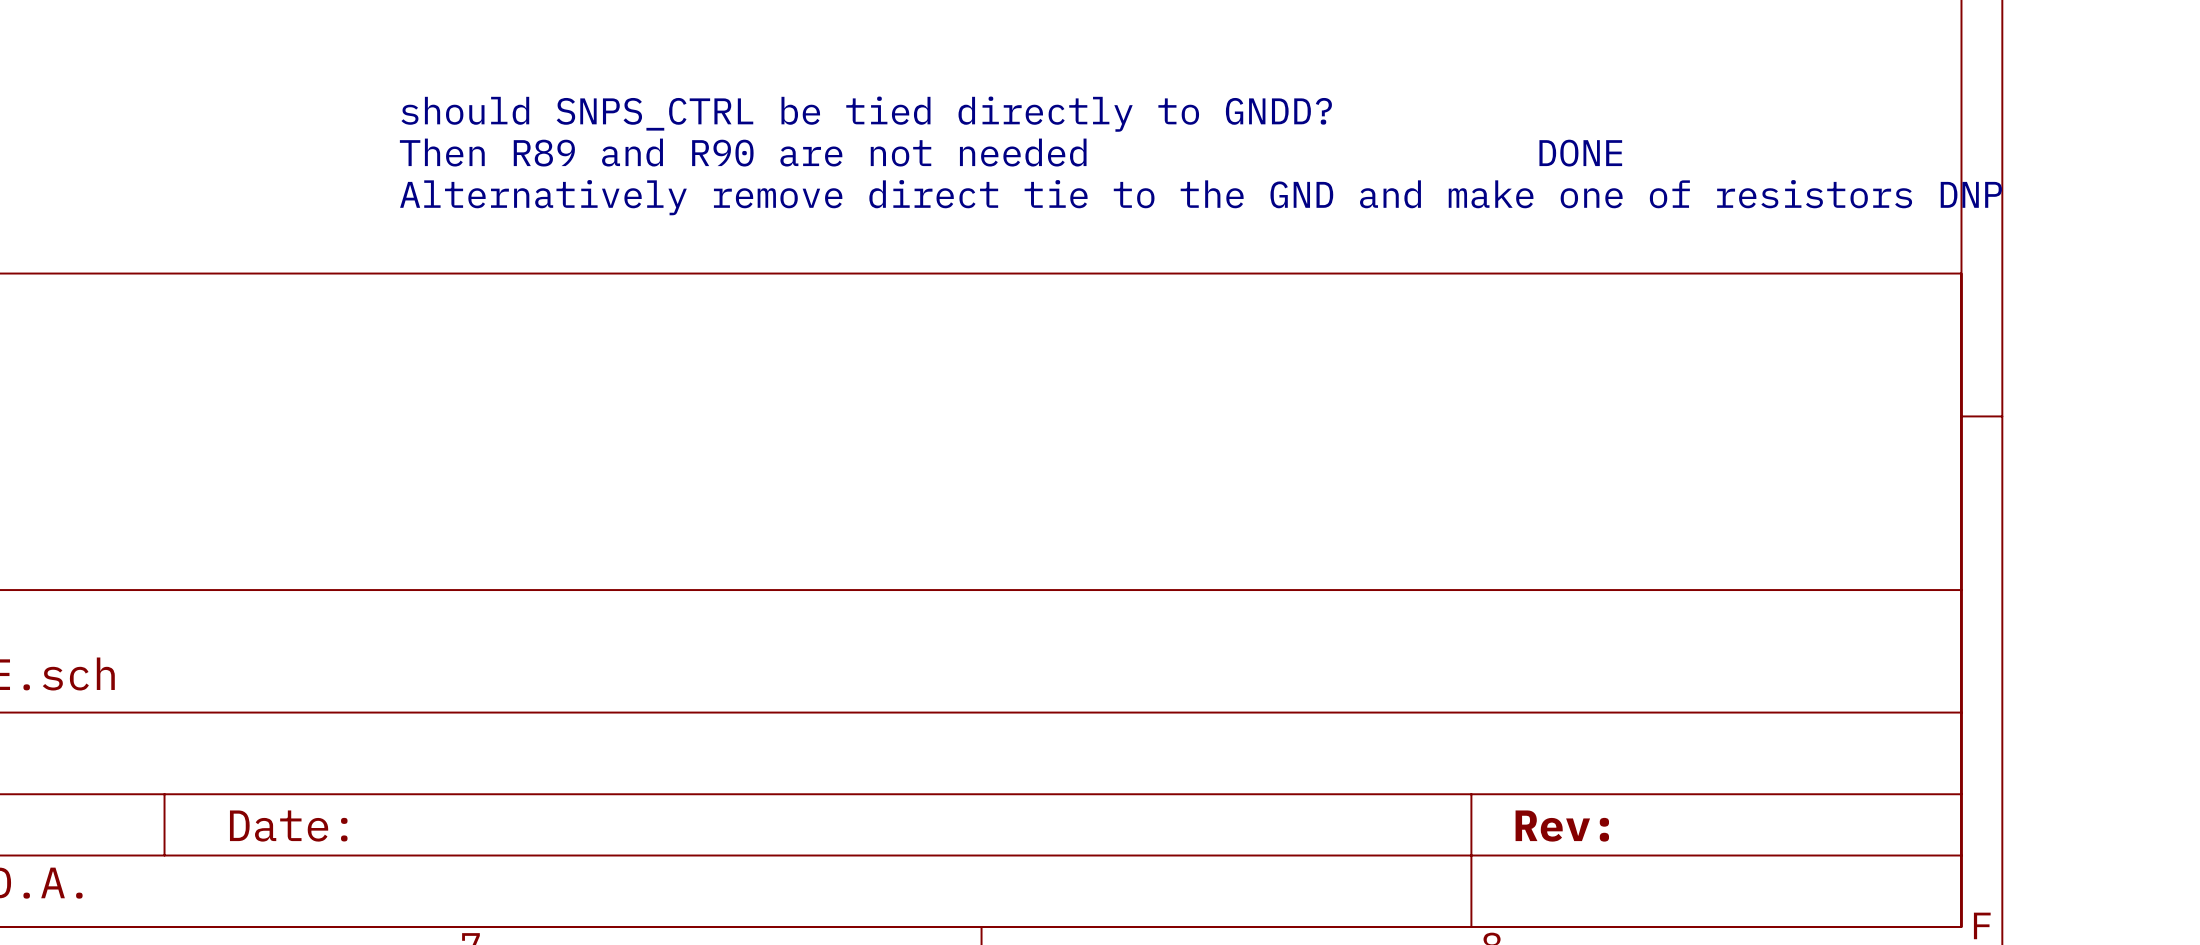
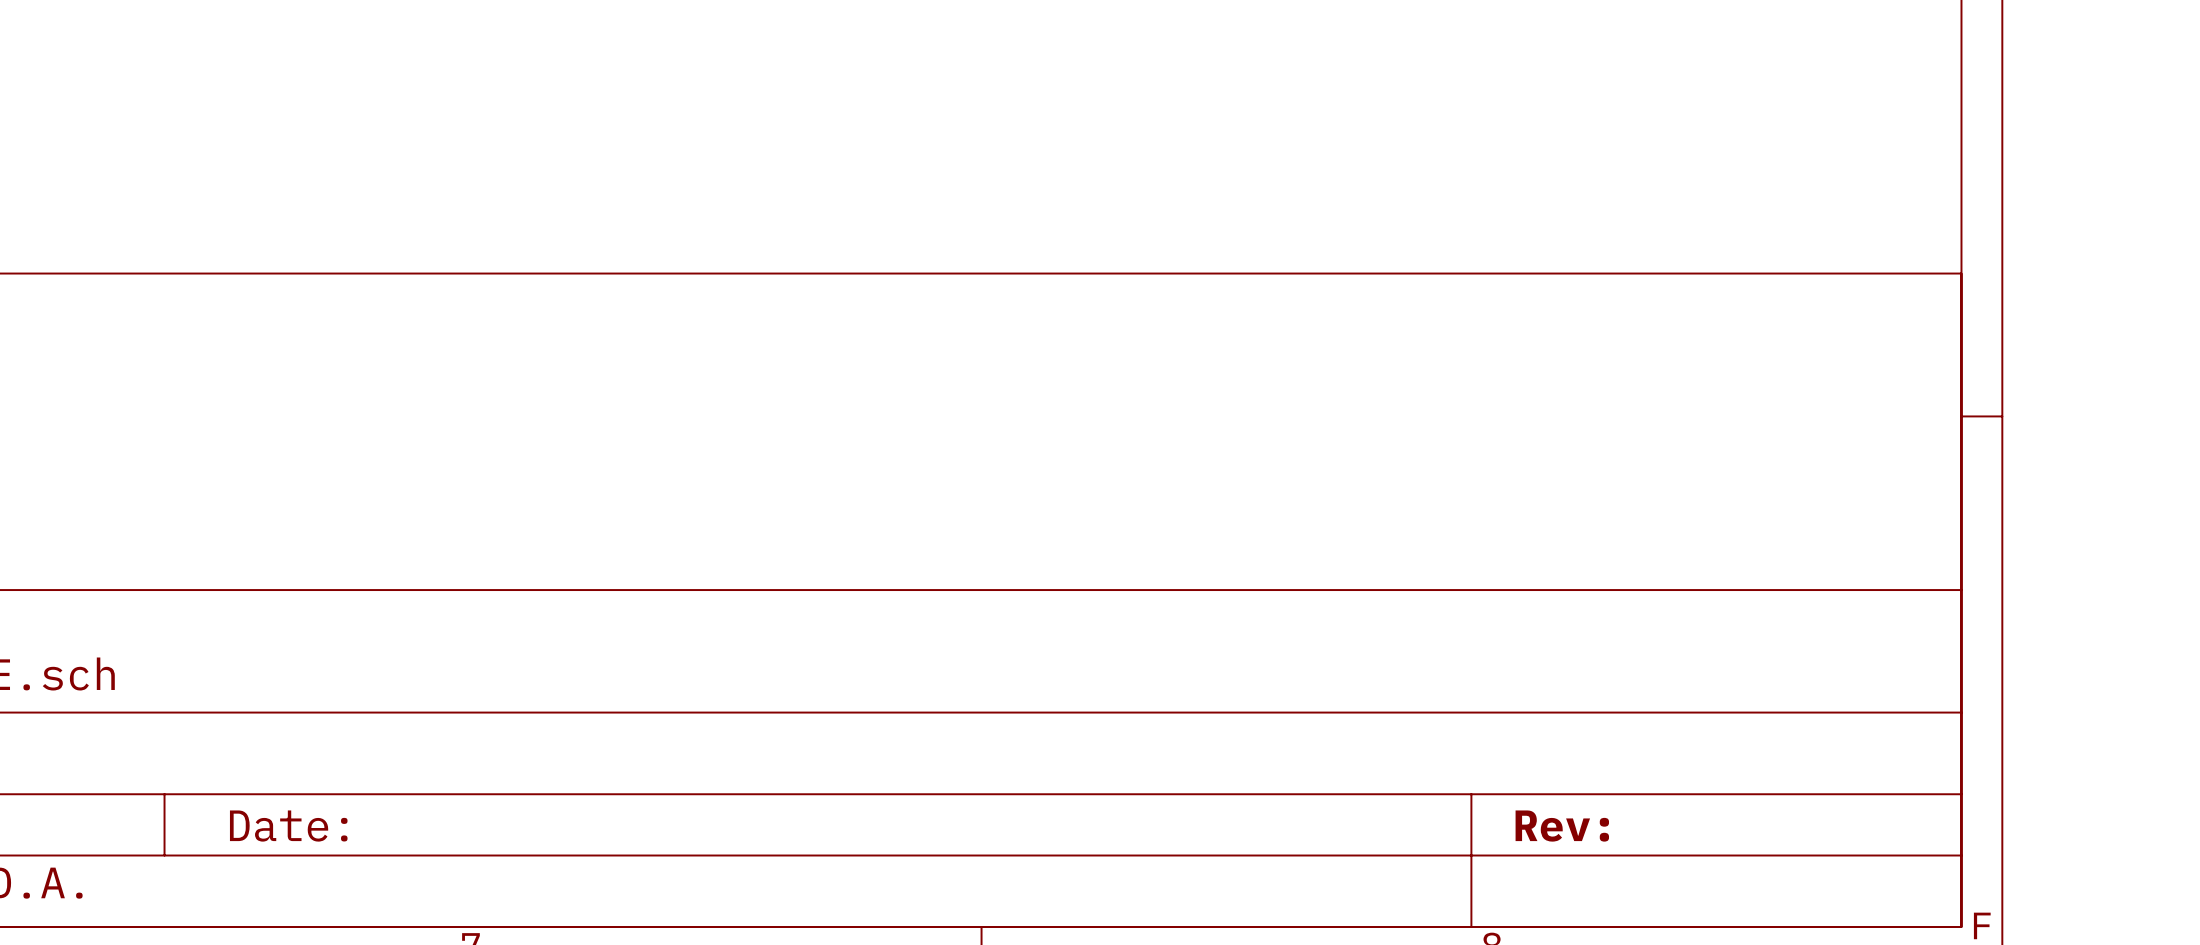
text: should SNPS_CTRL be tied directly to GNDD? (866, 114) -> none
text: Then R89 and R90 are not needed DONE (1011, 152) -> none
text: Alternatively remove direct tie to the GND and make one of resistors DNP (1201, 197) -> none

